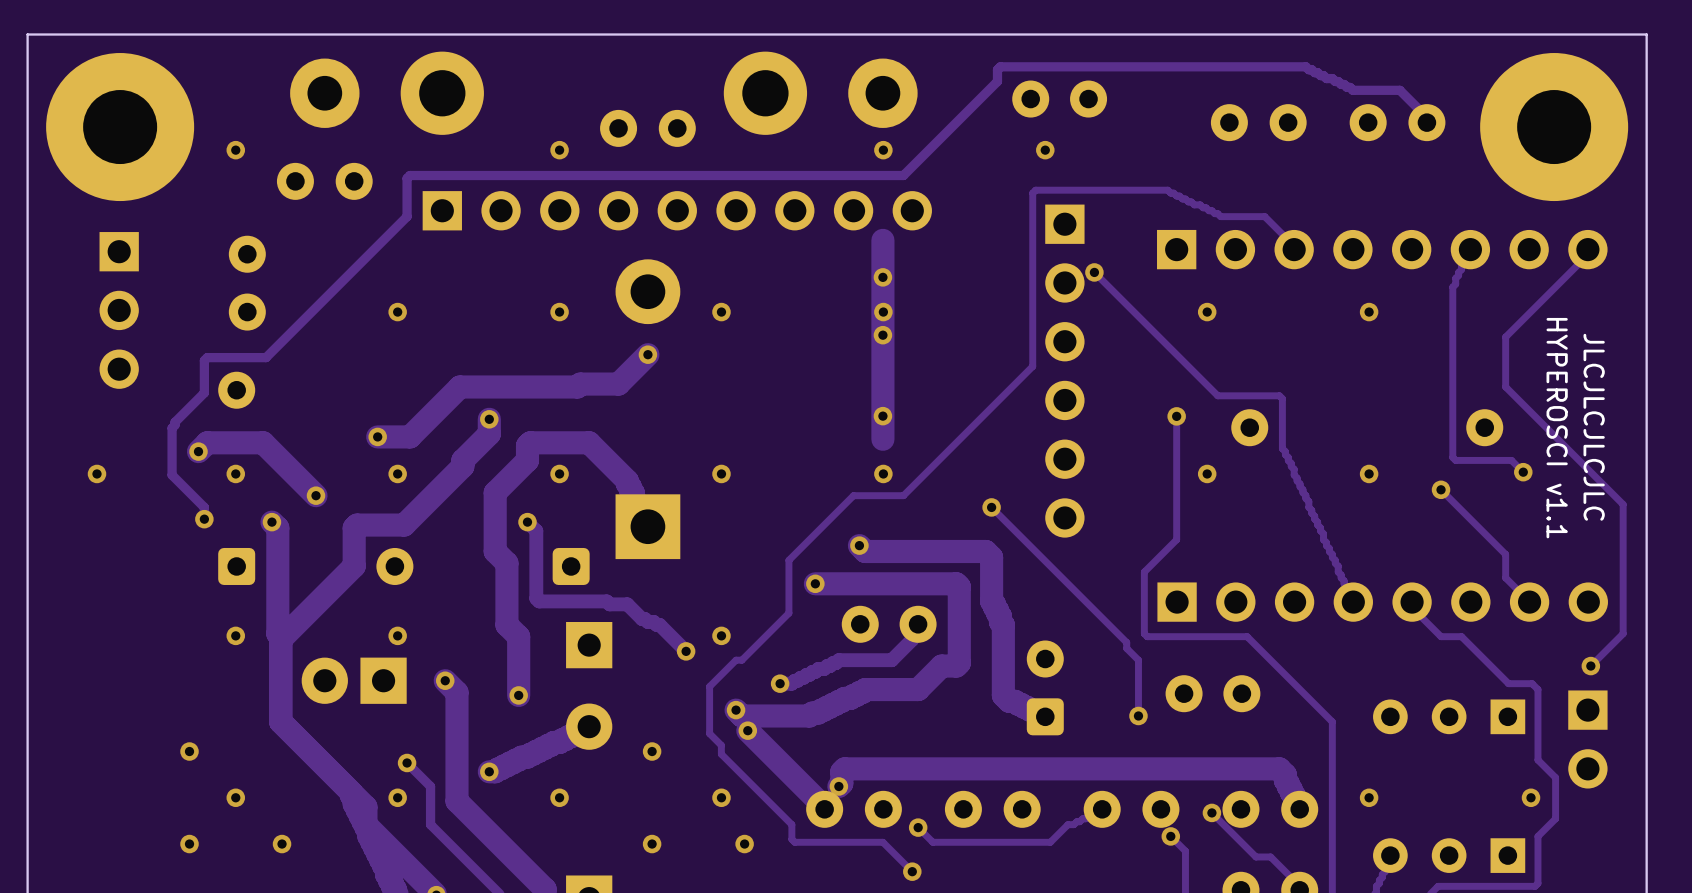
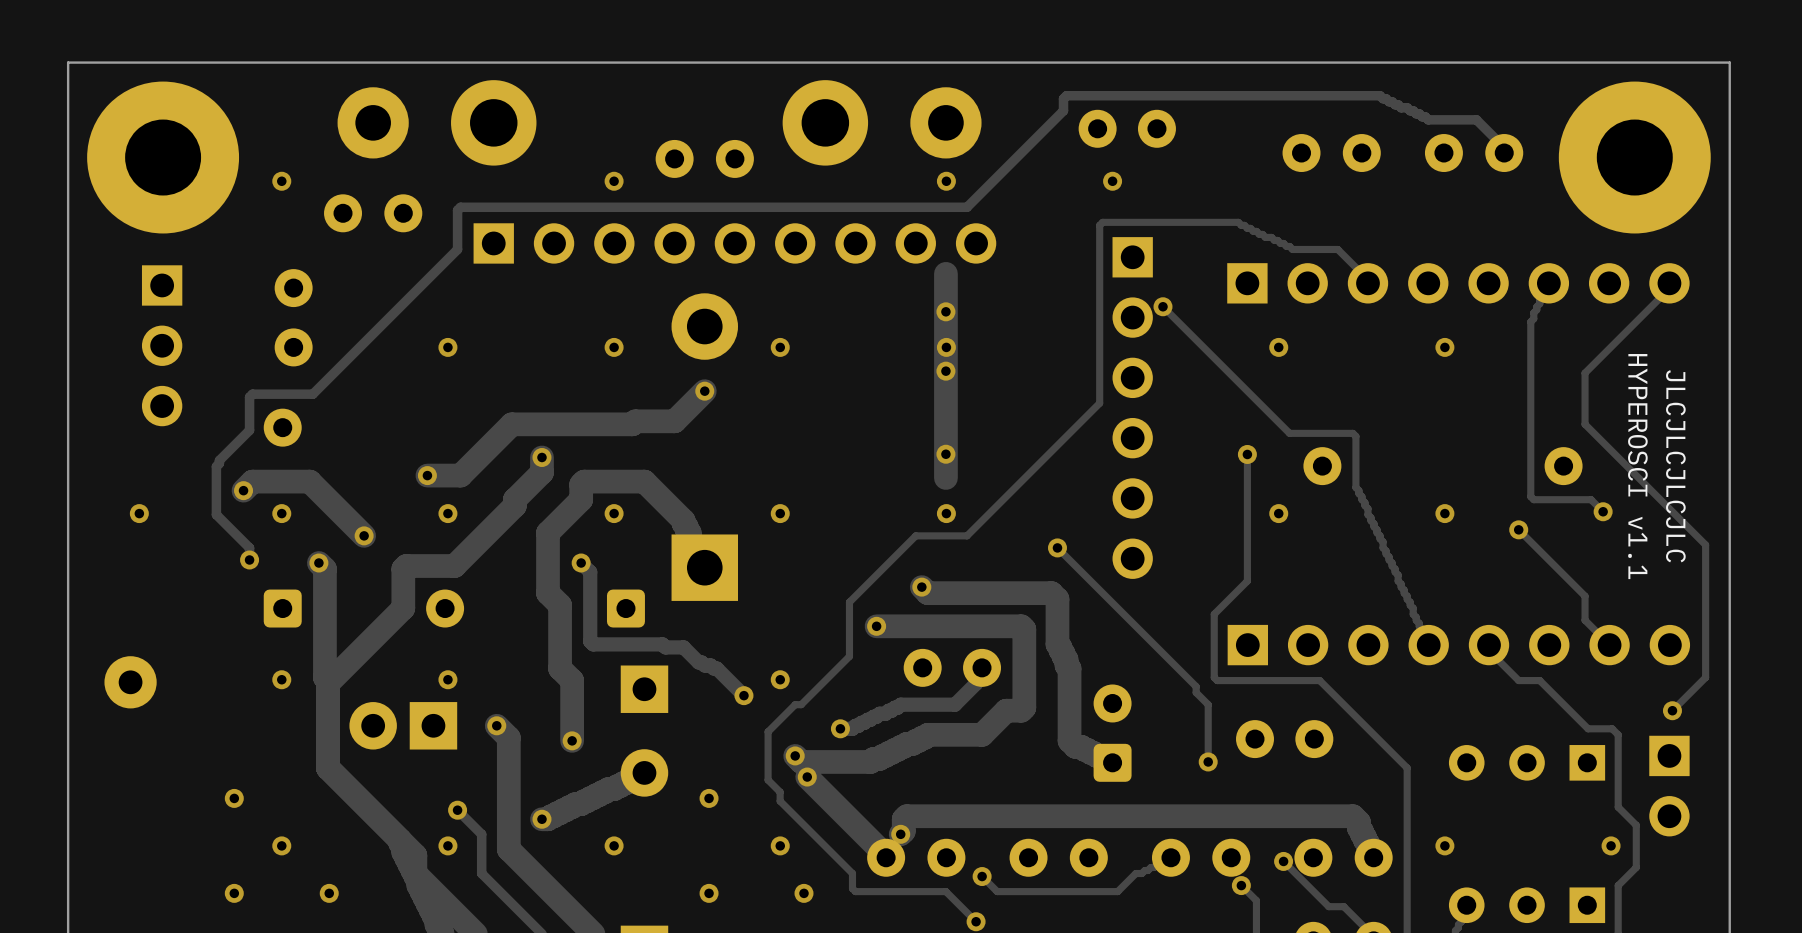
part: none -> (130, 682)

